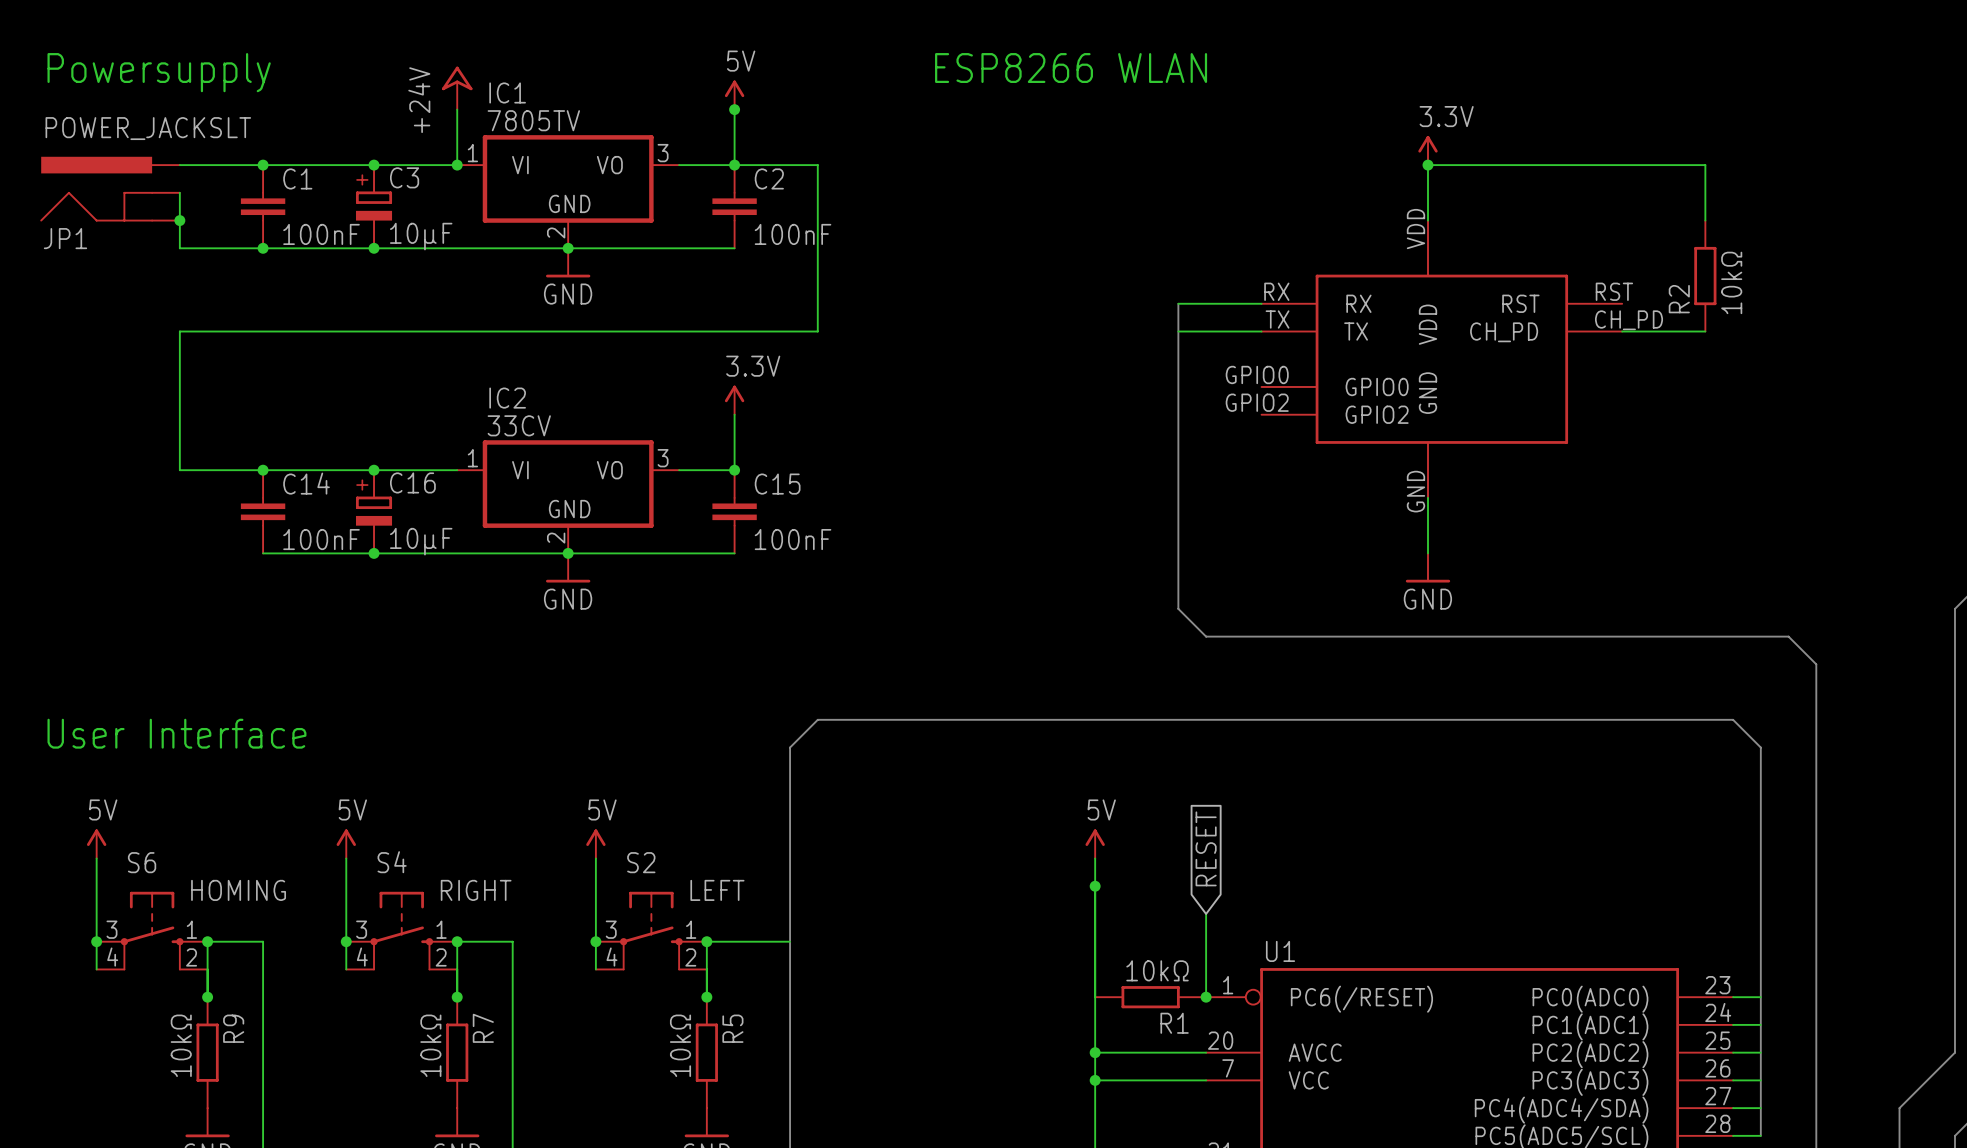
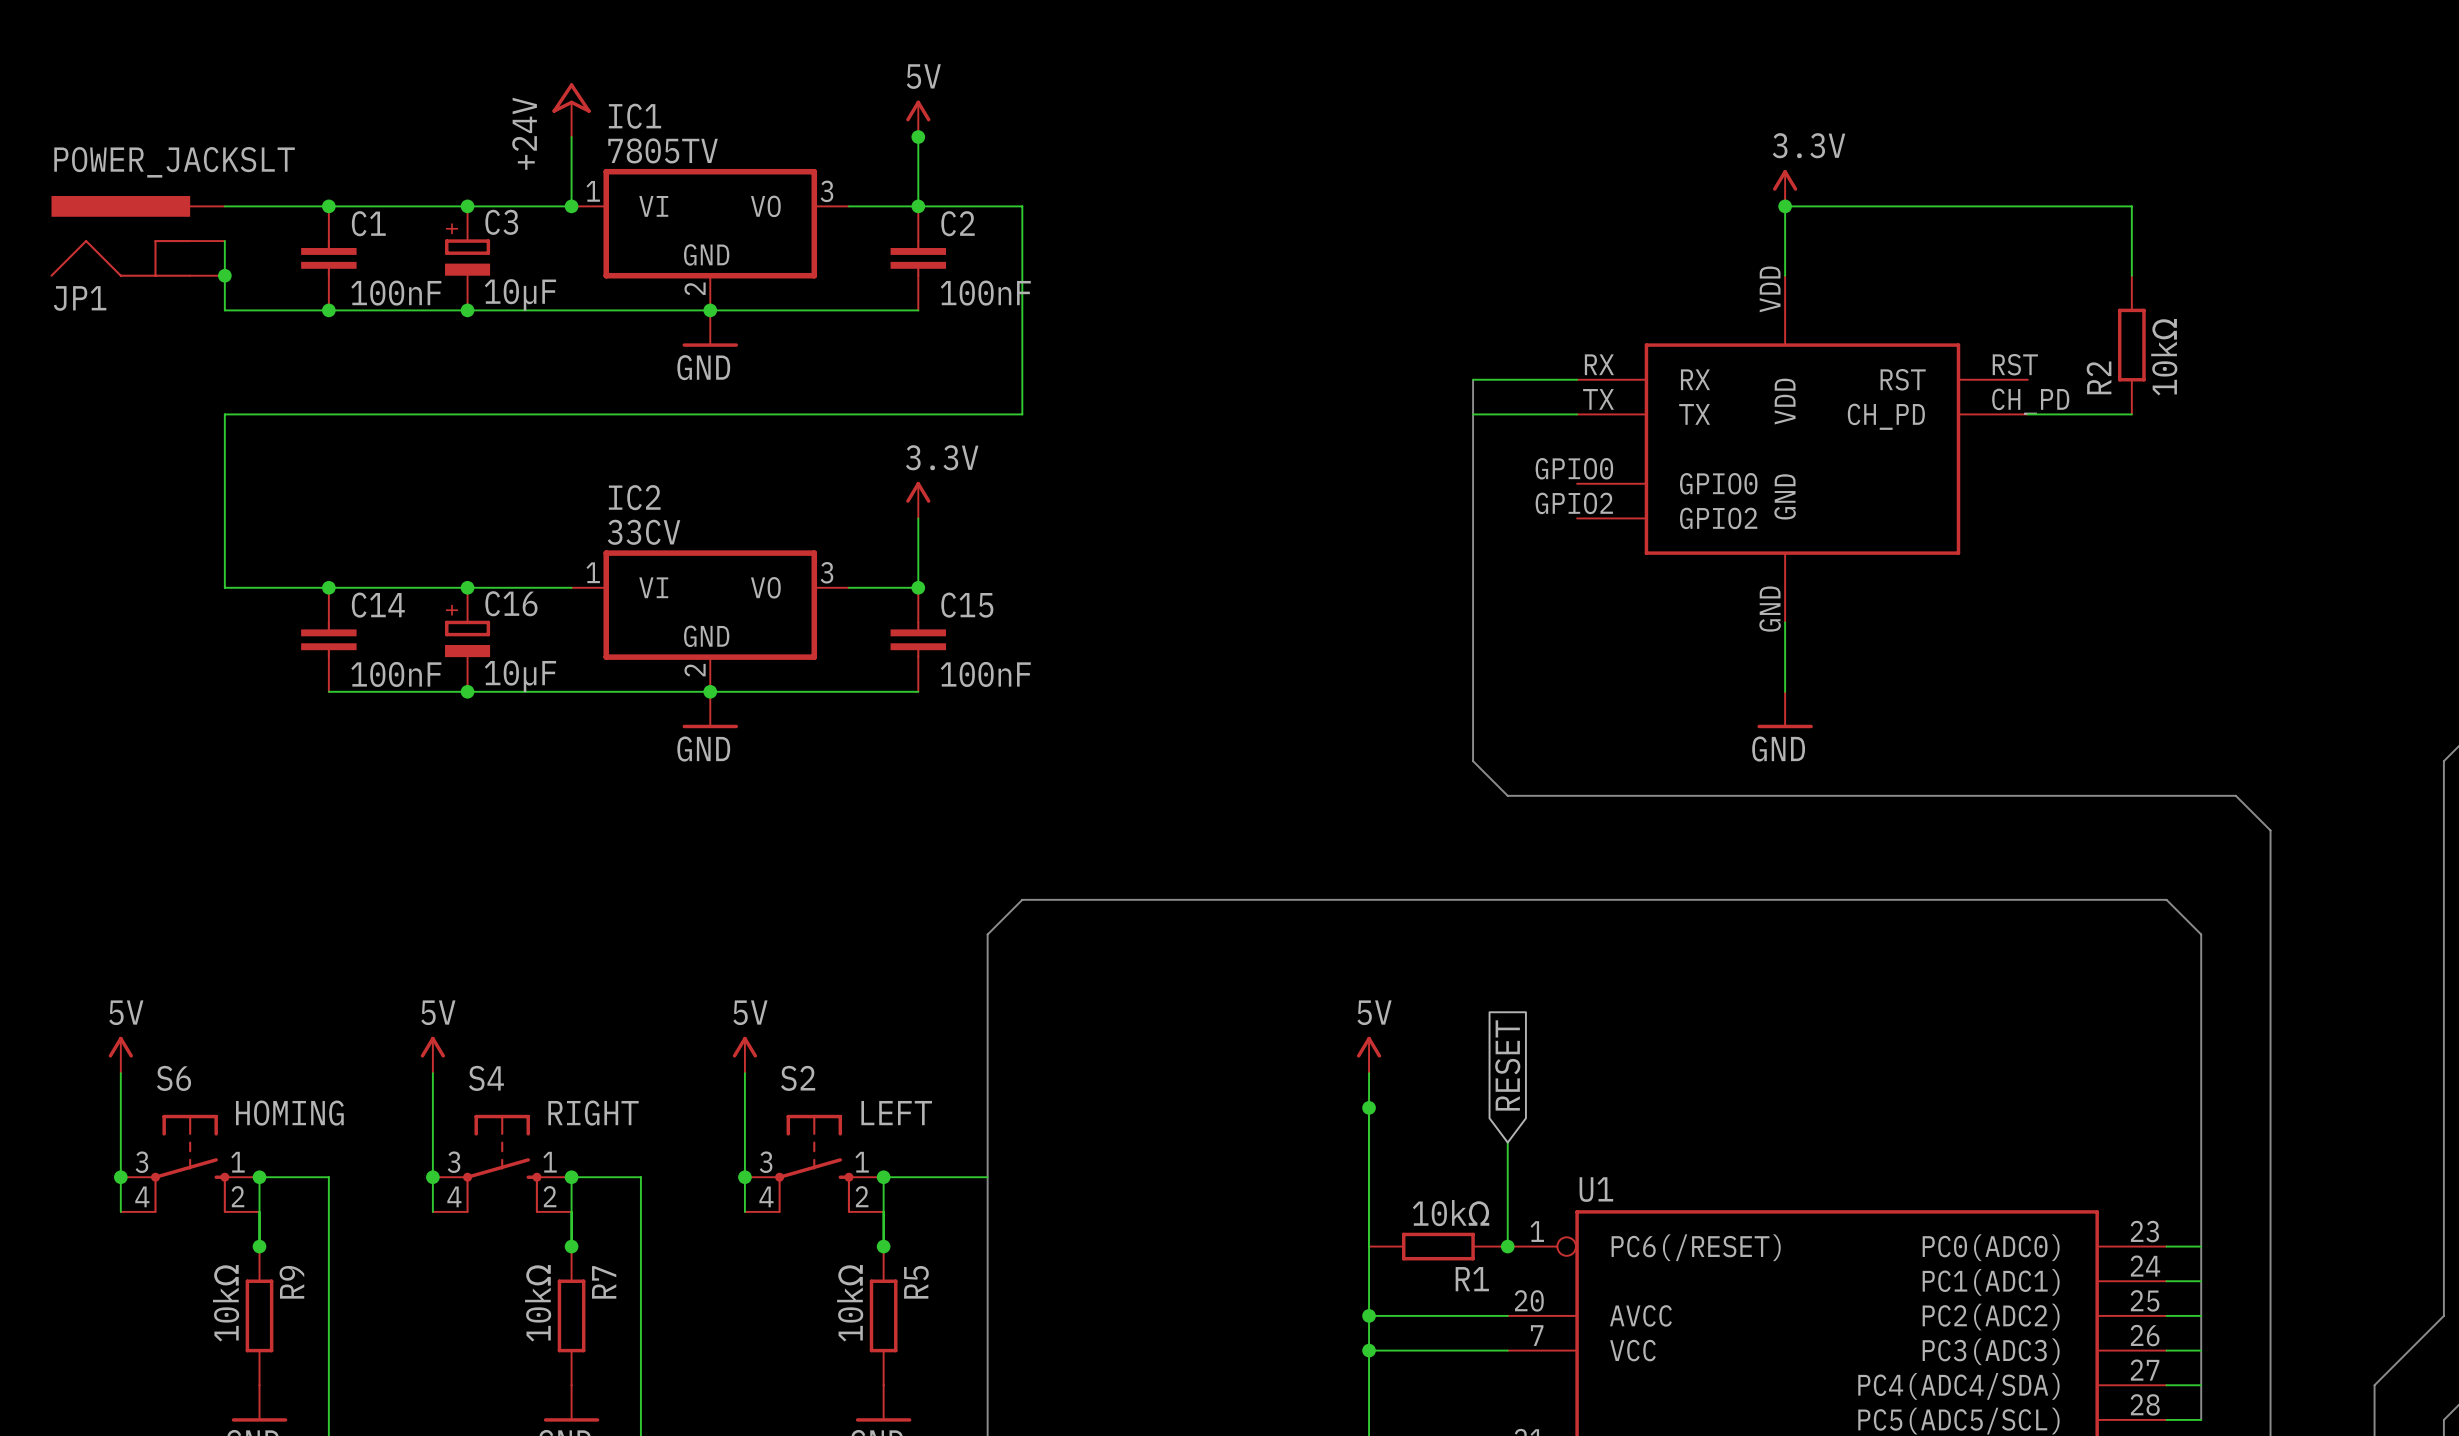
text: ESP8266 WLAN (1071, 68) -> none
text: Powersupply (159, 72) -> none
text: User Interface (176, 733) -> none

